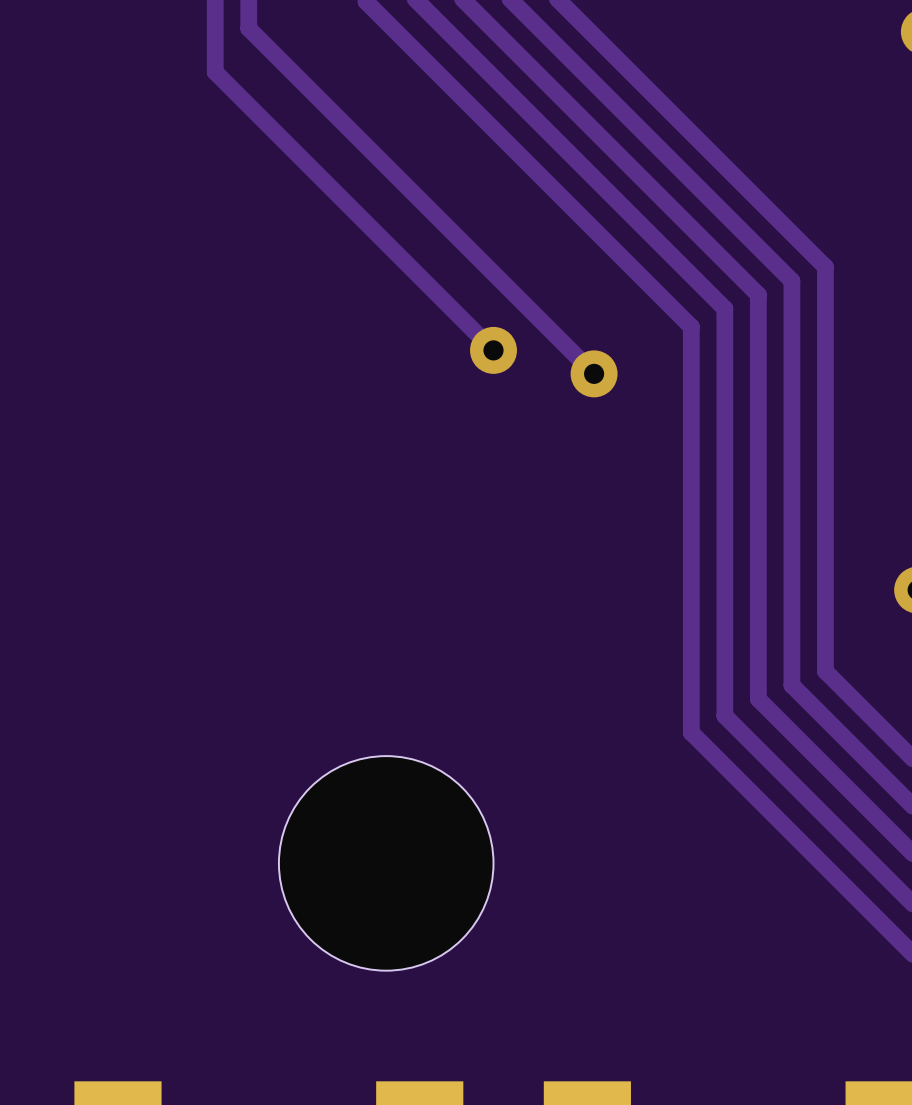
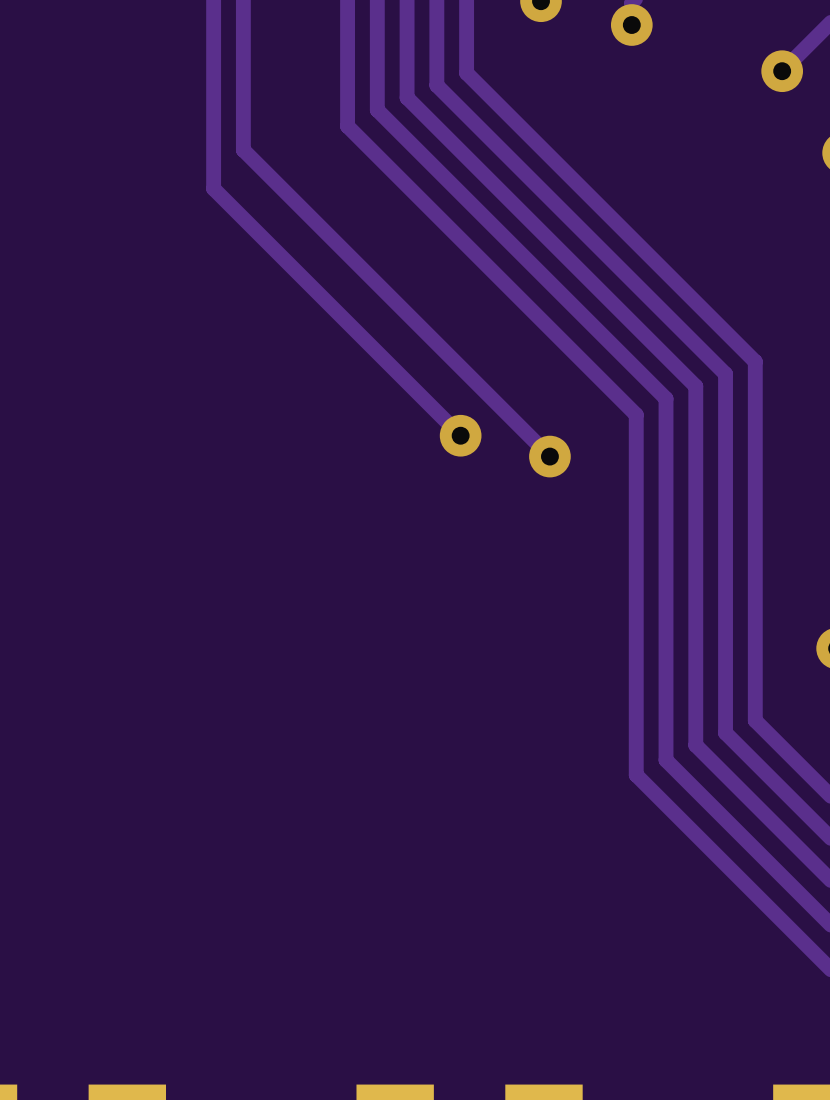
part: (386, 863) -> none

